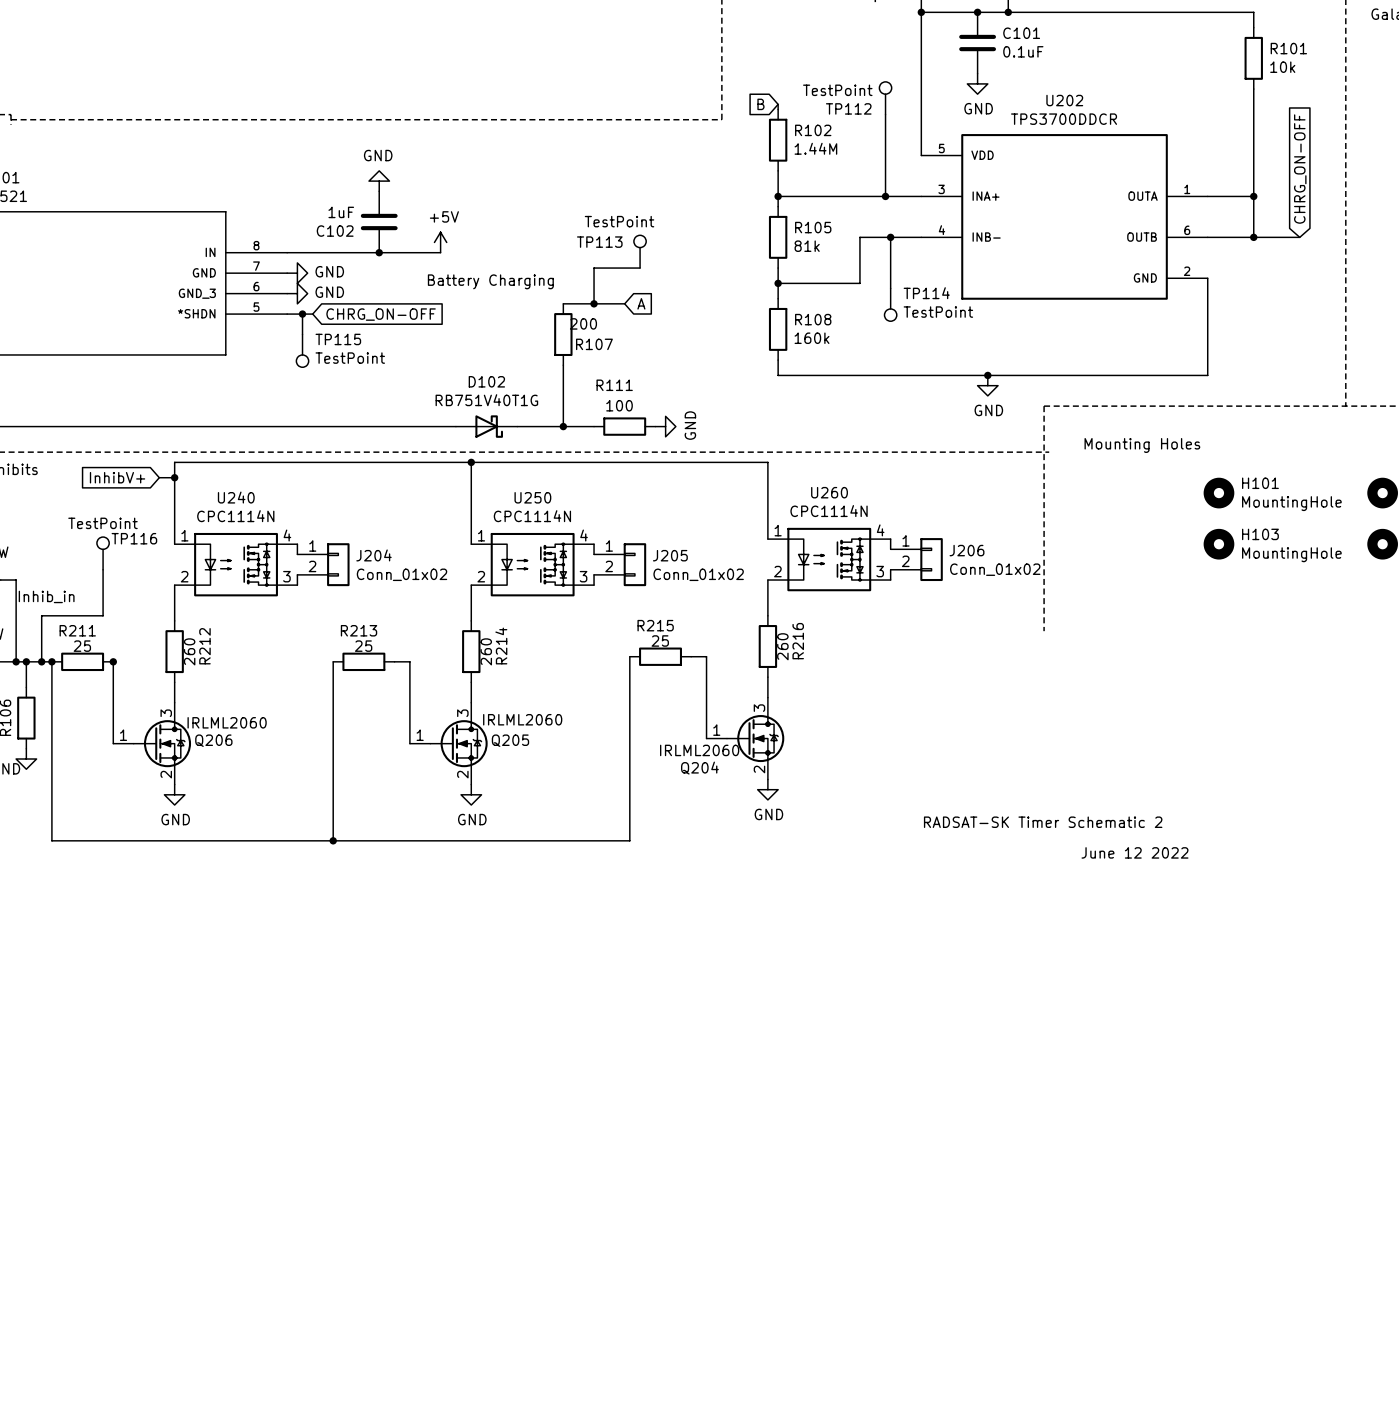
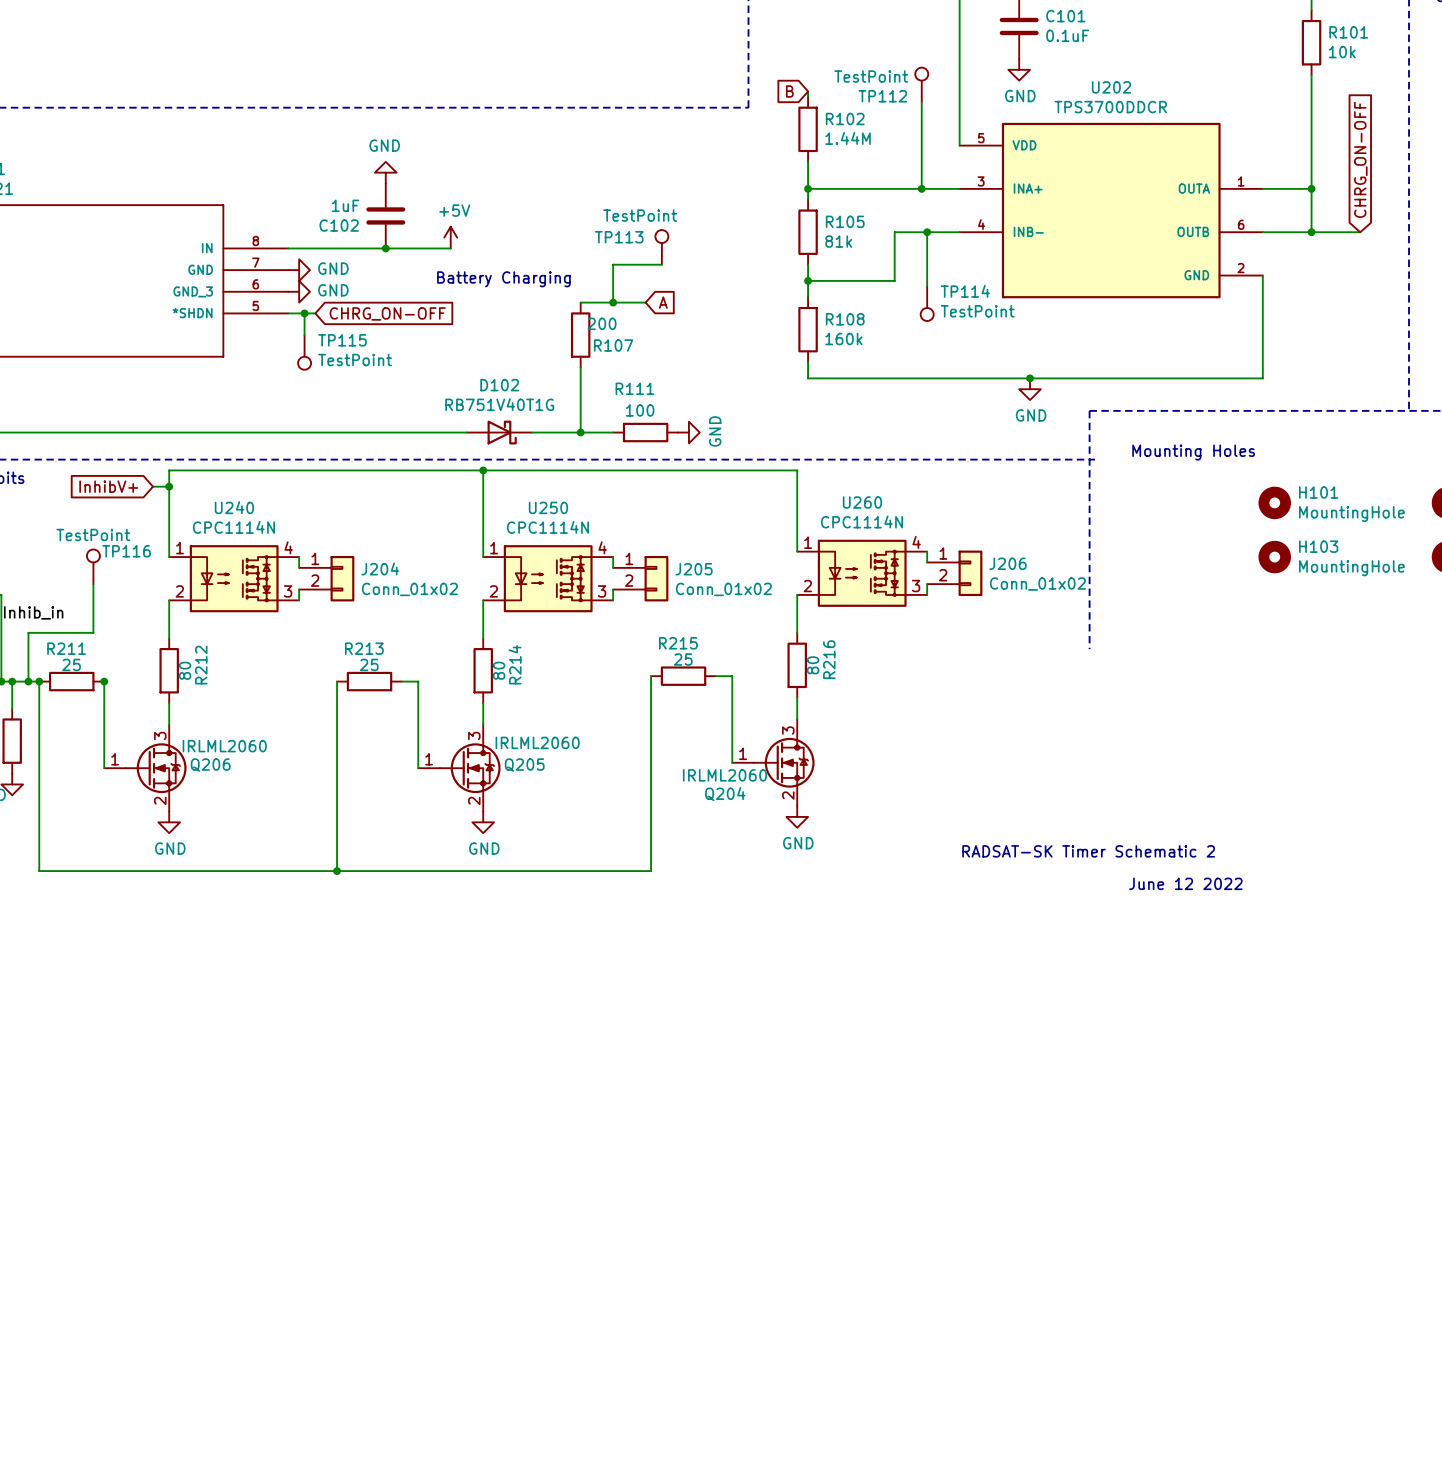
R216 value: 260 (782, 646) -> 80 (813, 665)
R212 value: 260 (189, 651) -> 80 (185, 670)
R214 value: 260 (486, 651) -> 80 (499, 670)

